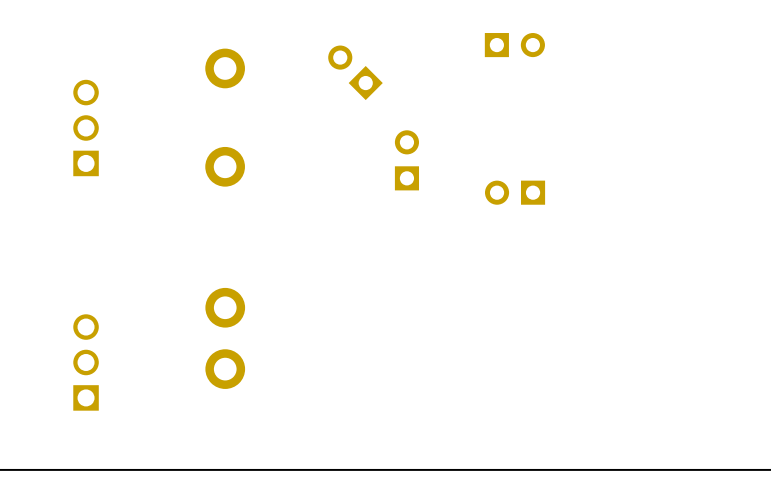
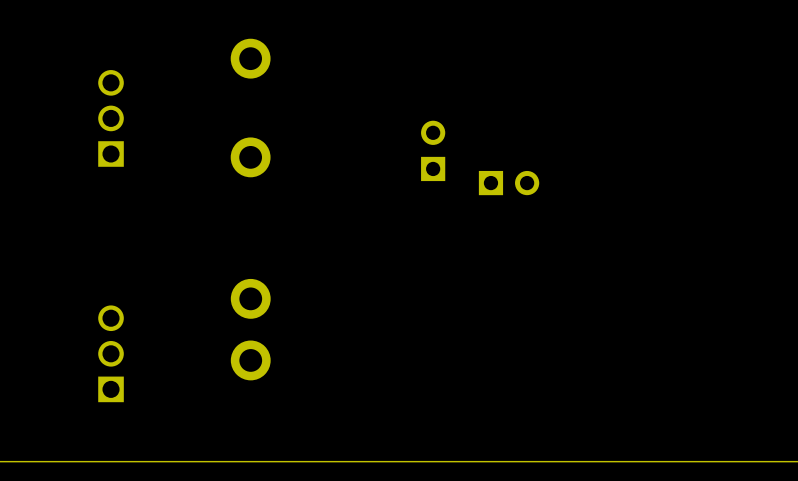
part: (514, 45) -> none
part: (355, 72) -> none
part rotation: 0° (515, 192) -> 180° (509, 183)

